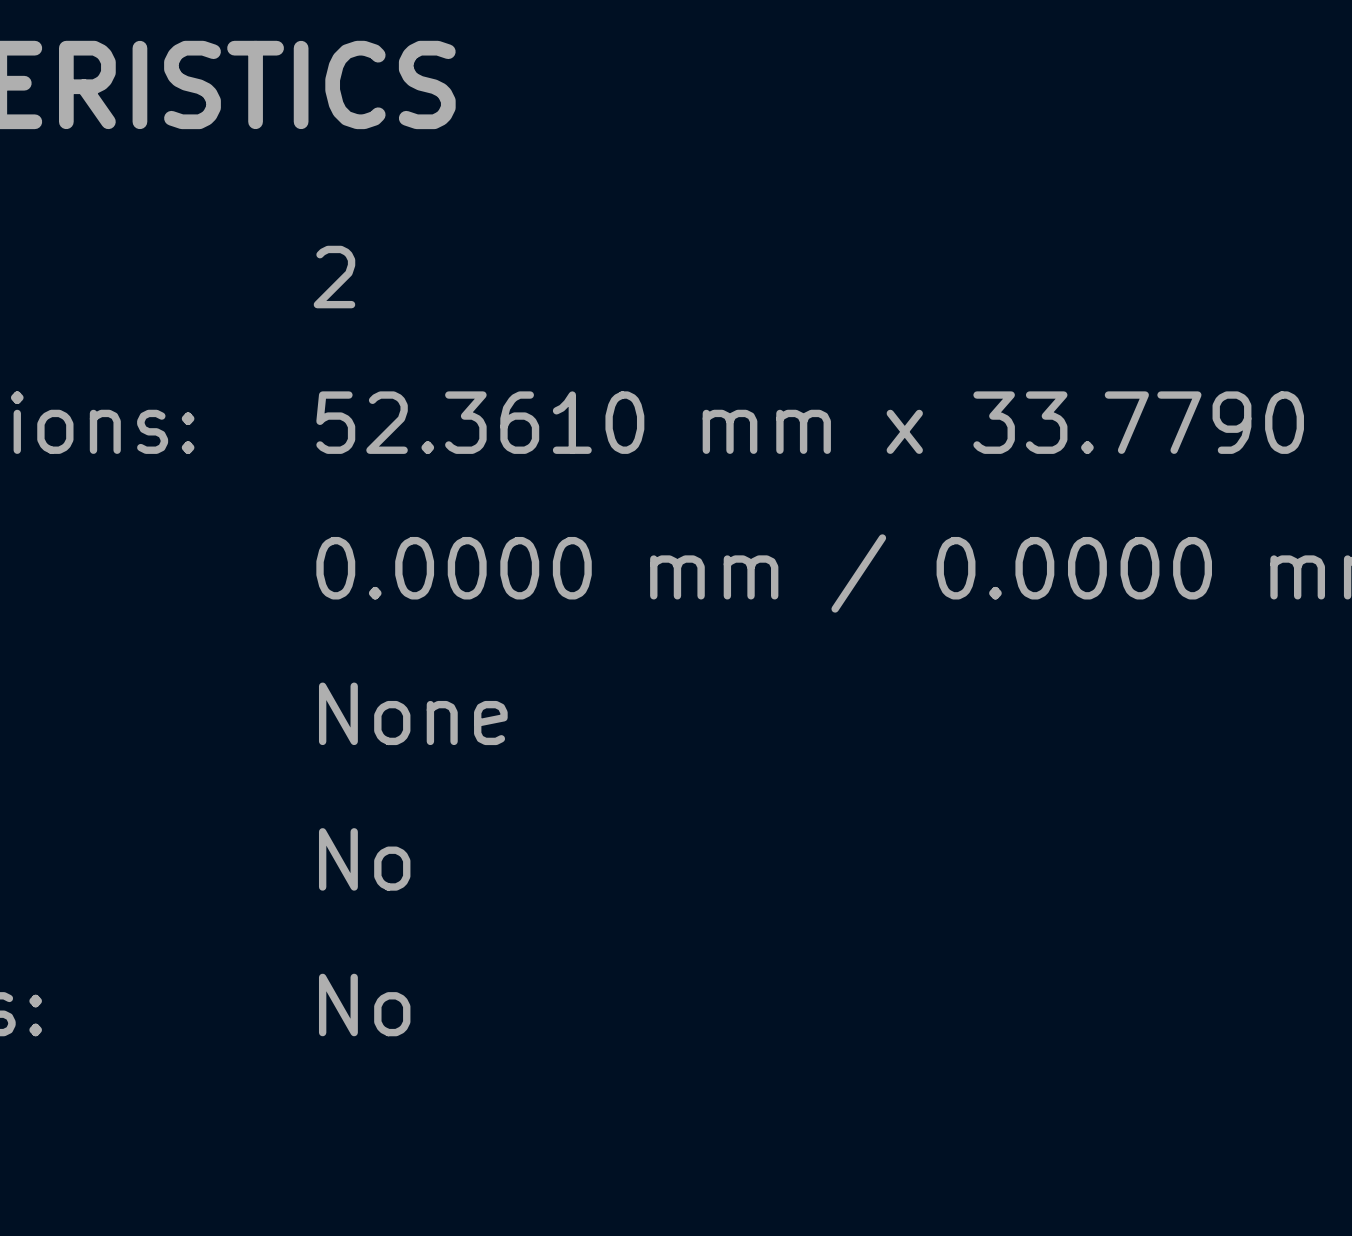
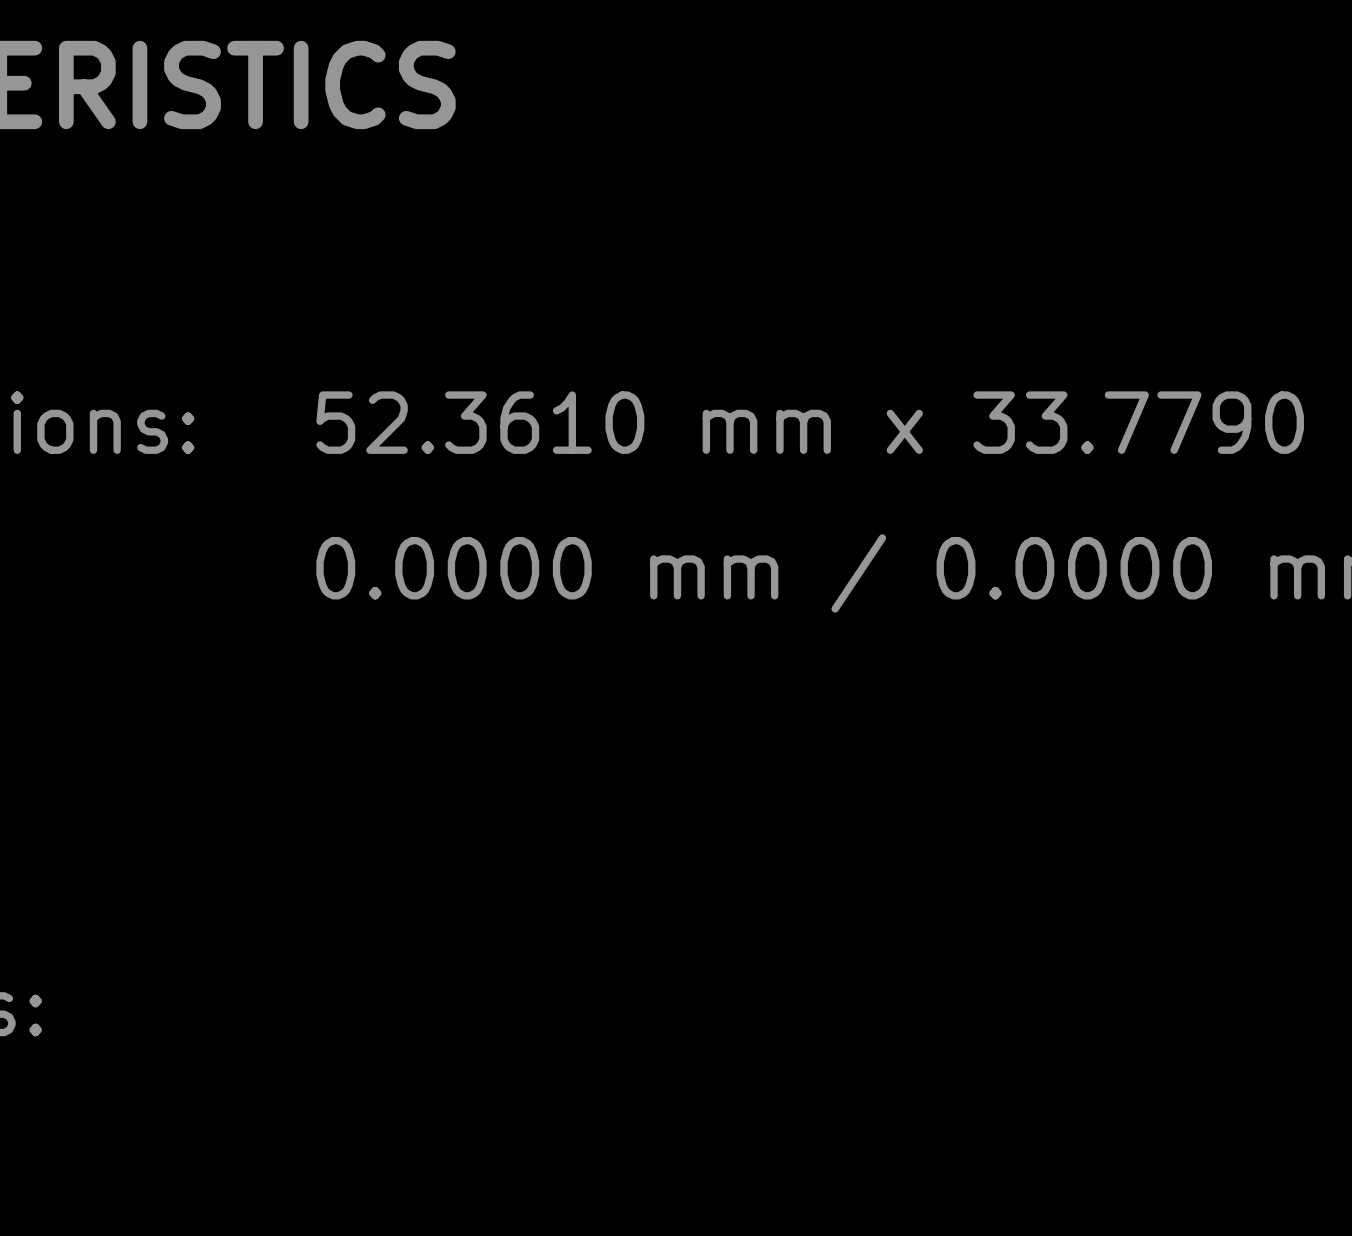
text: 2 (334, 277) -> none
text: None (413, 713) -> none
text: No (364, 859) -> none
text: No (364, 1004) -> none

